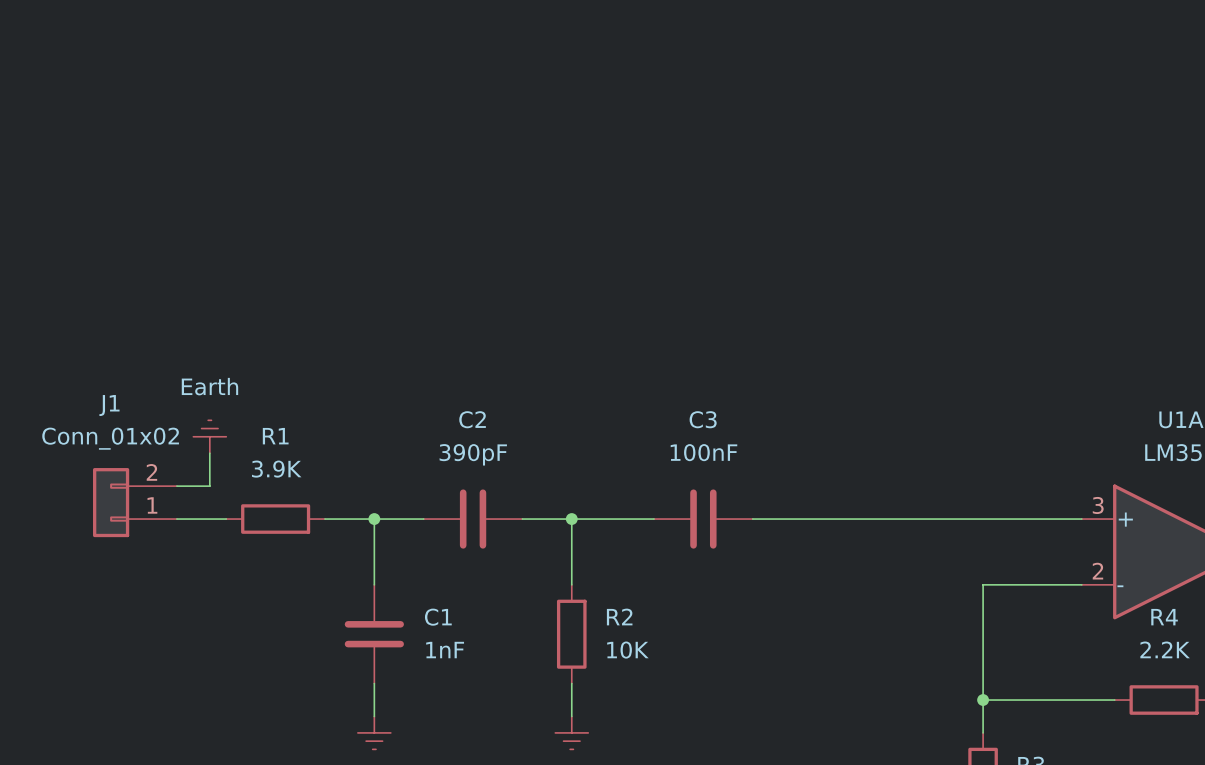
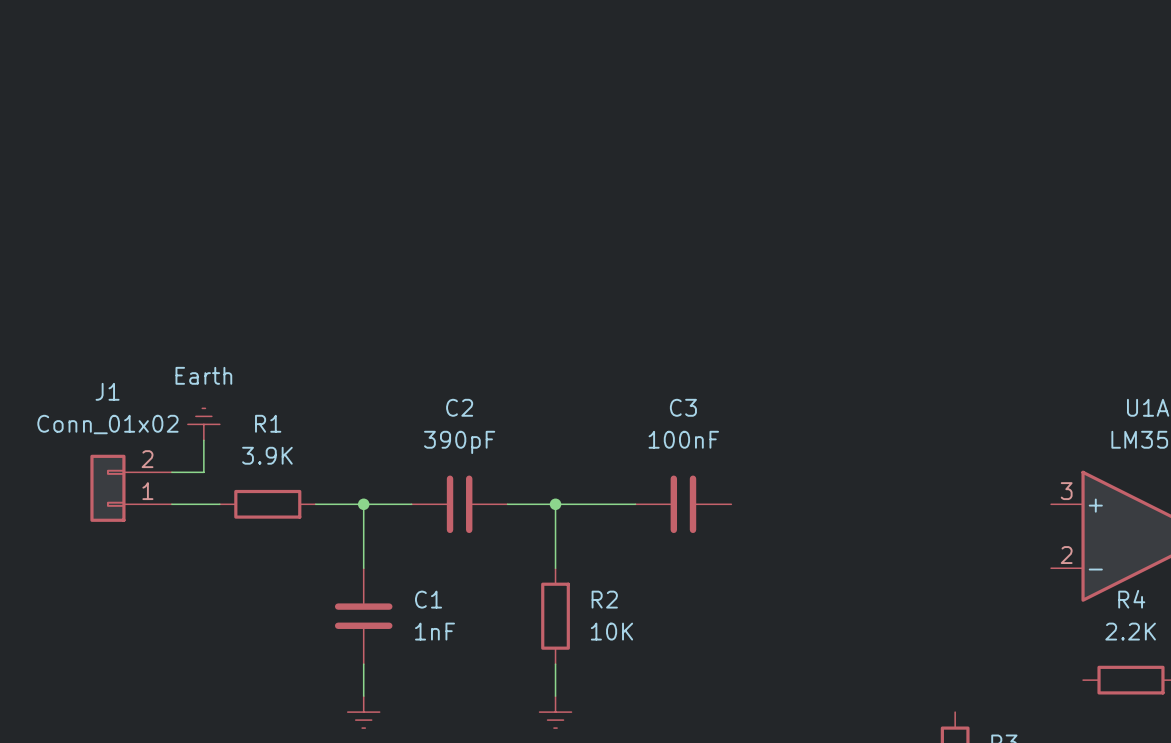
wire: (752, 519) (1081, 519) -> none
wire: (1081, 584) (983, 584) (983, 732) -> none
wire: (983, 700) (1114, 700) -> none
junction: (983, 700) -> none

